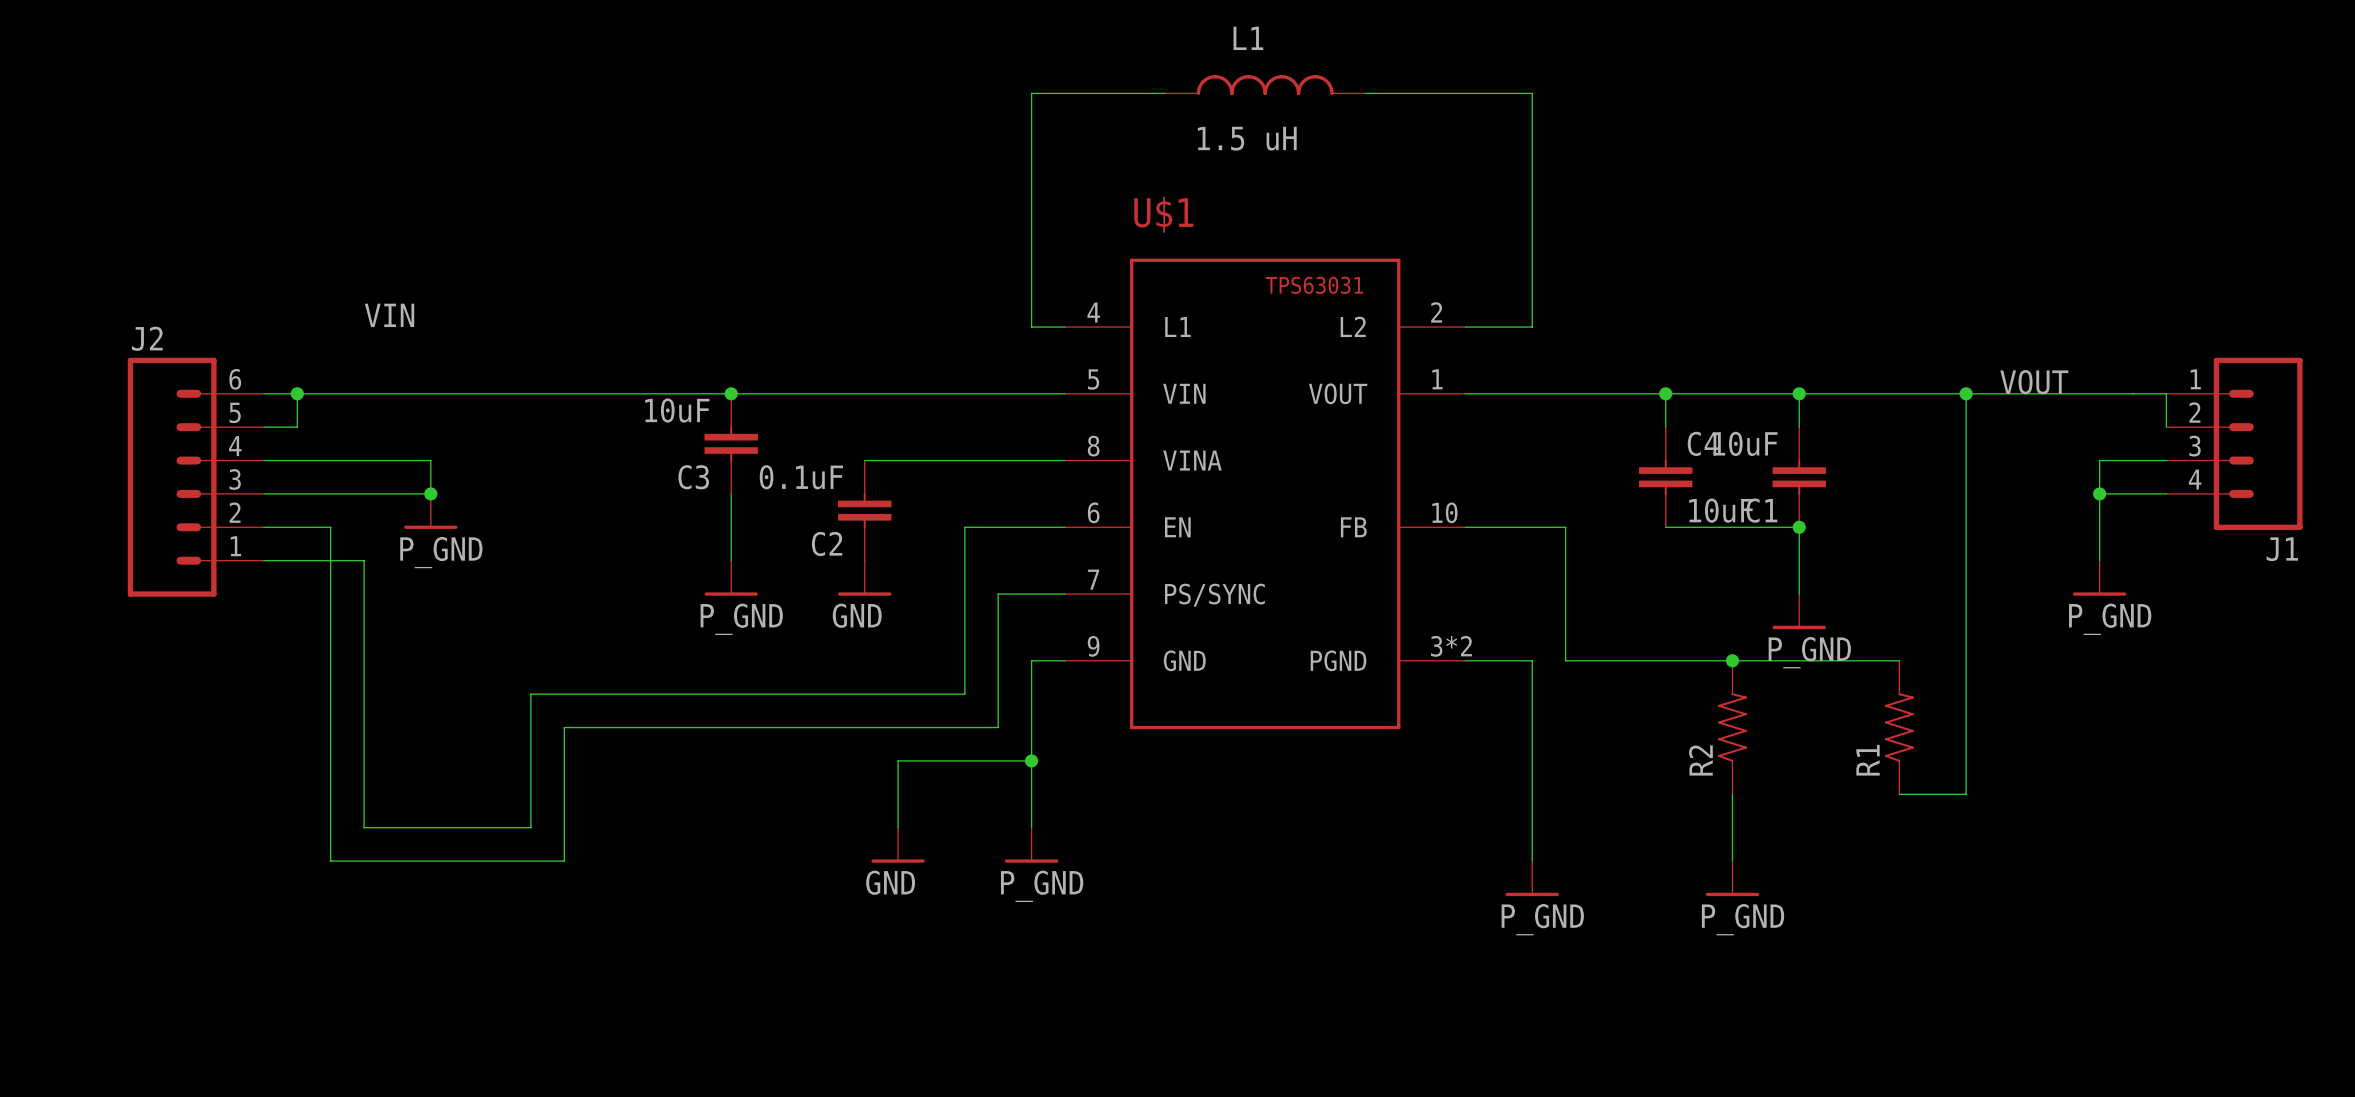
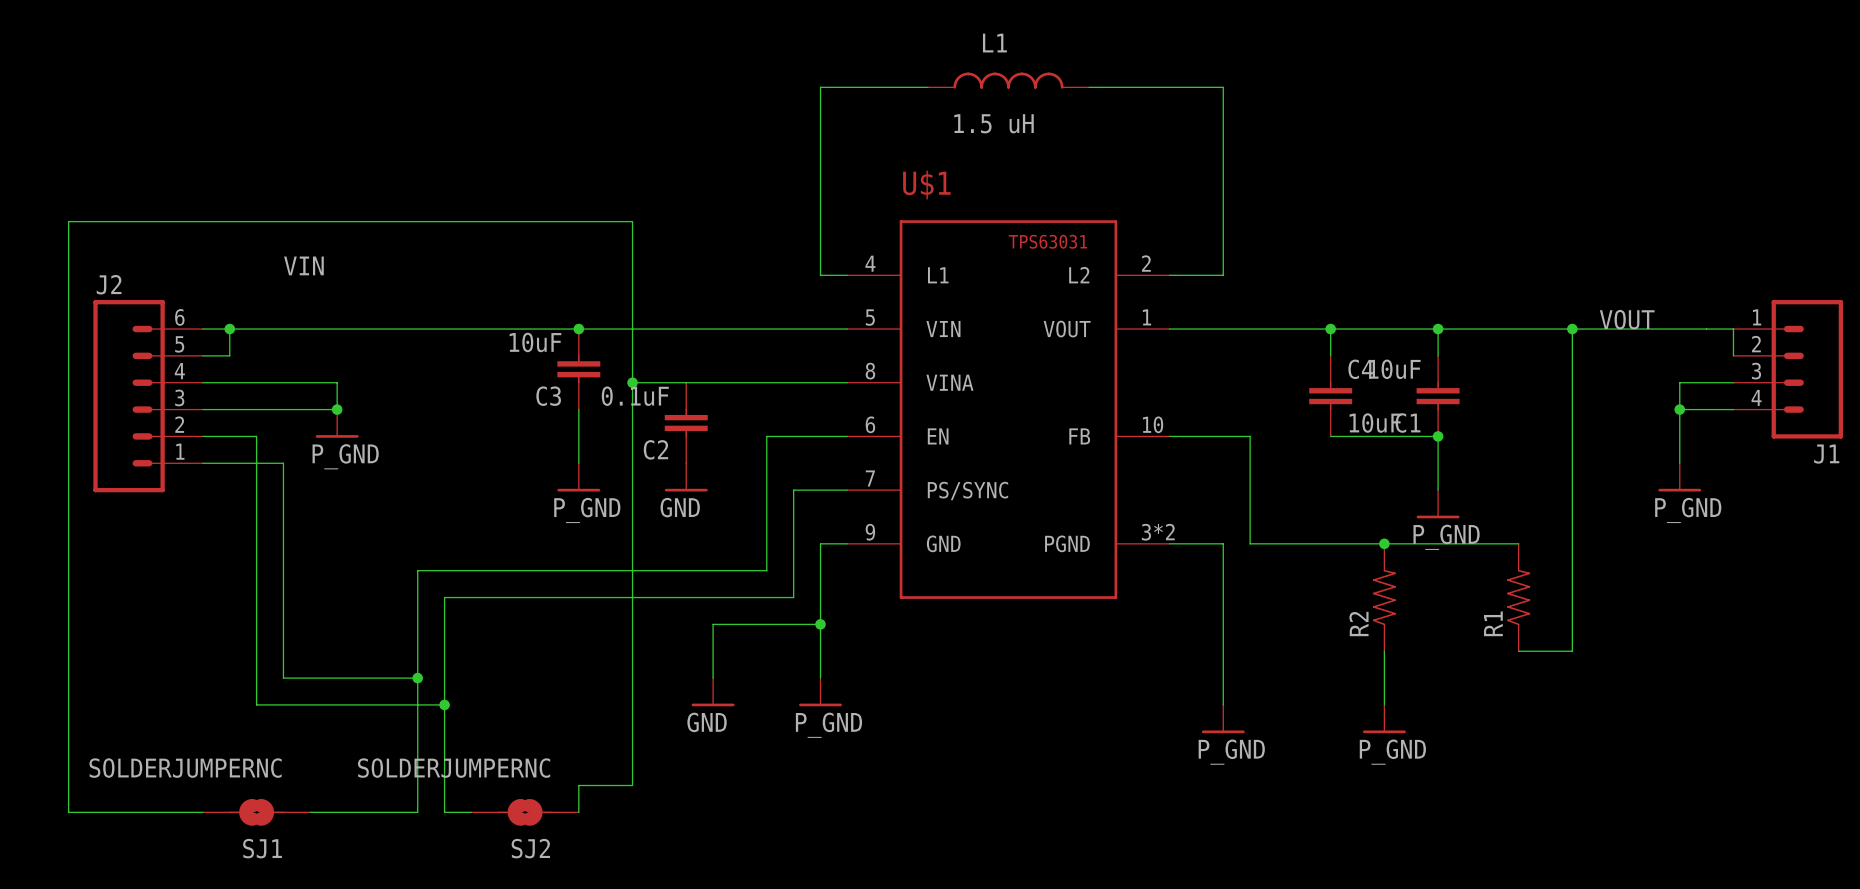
wire: none -> (632, 382) (686, 382)
junction: none -> (632, 382)
wire: none -> (417, 678) (417, 812) (310, 812)
junction: none -> (417, 678)
wire: none -> (444, 704) (444, 812) (471, 812)
junction: none -> (444, 704)
wire: none -> (202, 812) (68, 812) (68, 221) (632, 221) (632, 785) (578, 785) (578, 812)
SJ1: none -> SOLDERJUMPERNC (256, 812)
SJ2: none -> SOLDERJUMPERNC (525, 812)

